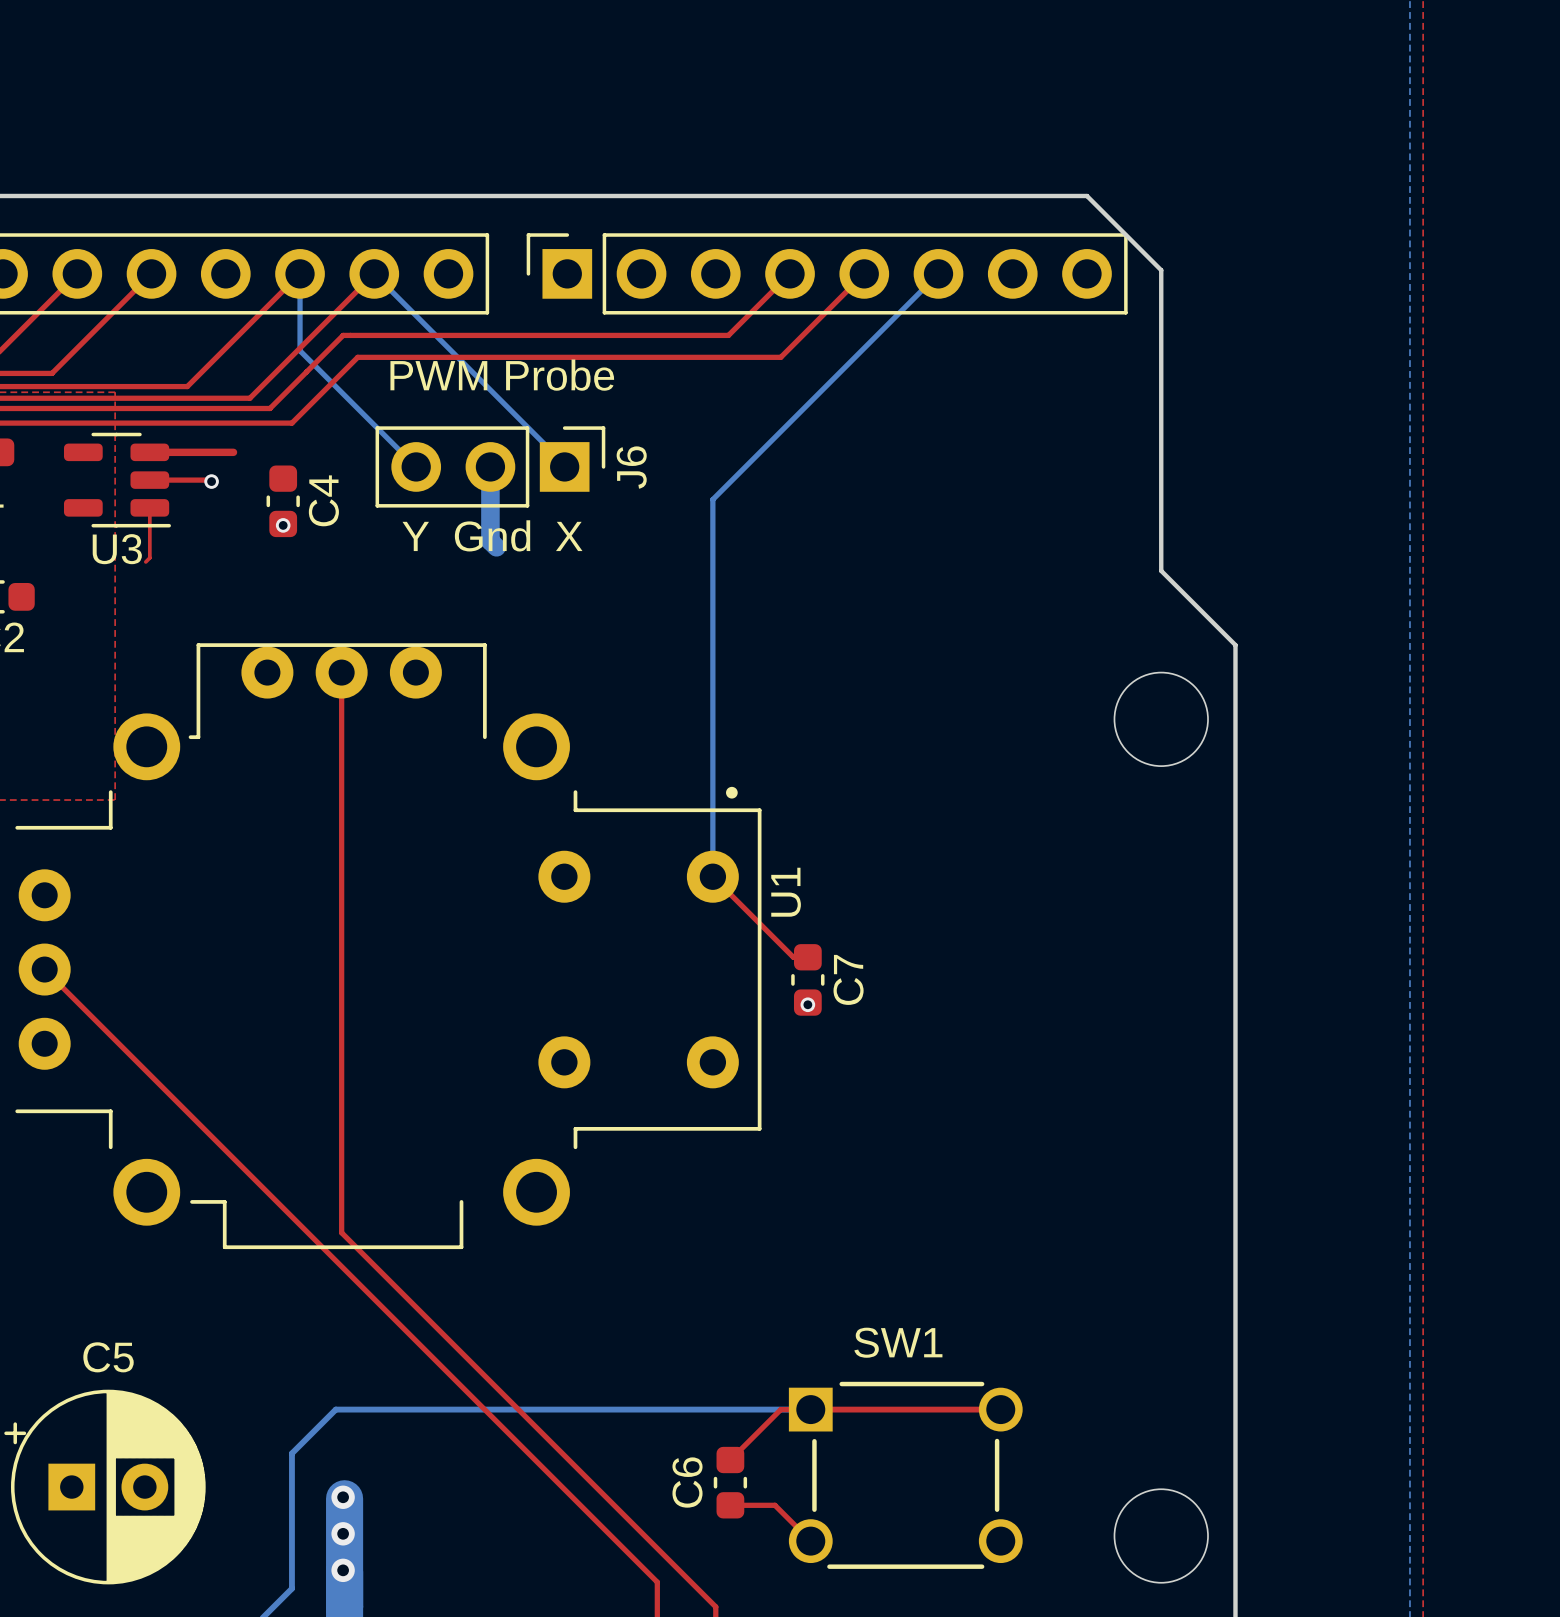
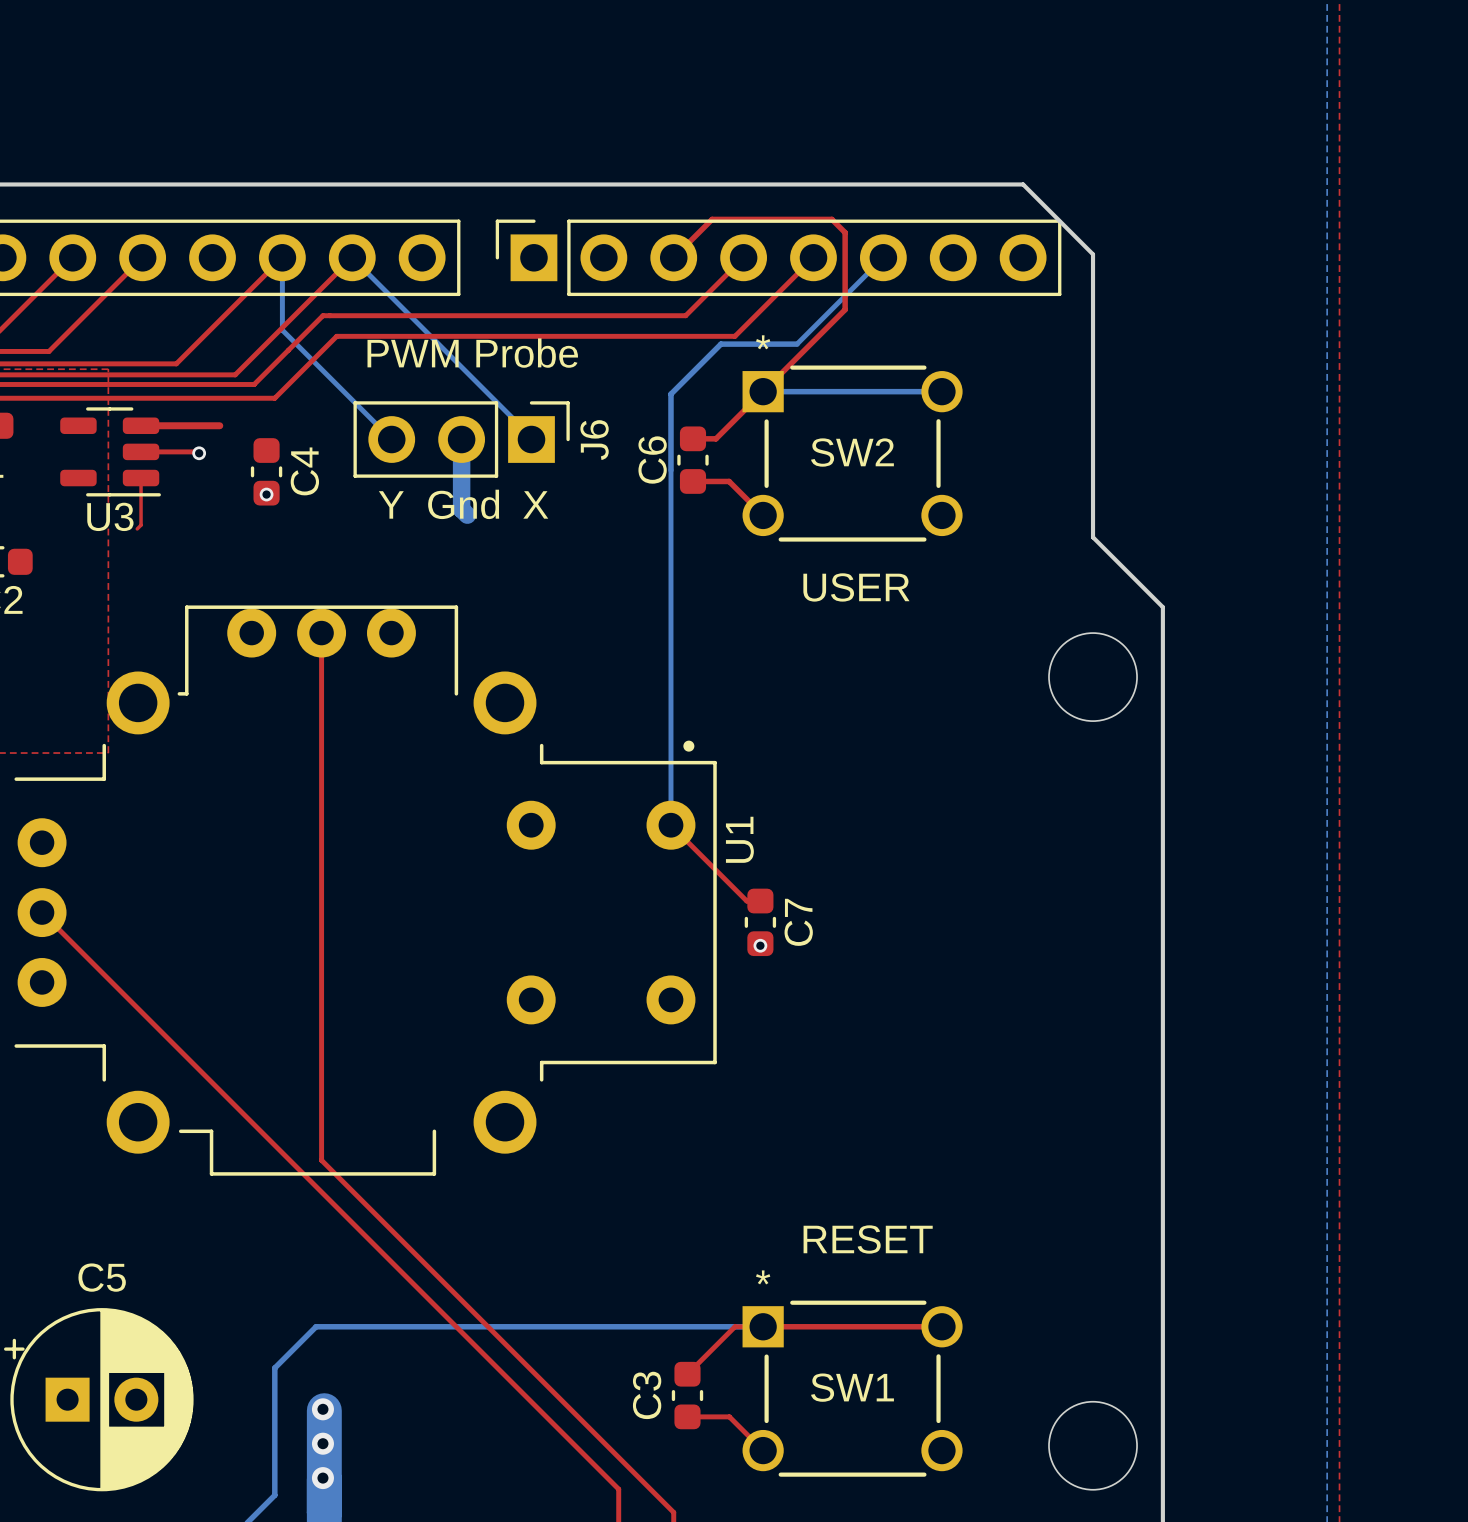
top track: none -> (673, 257) (712, 219) (831, 219) (845, 232) (845, 309) (715, 438) (692, 438)
bottom track: (846, 365) (712, 499) -> (797, 344) (720, 344) (670, 394) (670, 470)
bottom track: none -> (763, 391) (941, 391)
SW2: none -> (852, 453)
C6: none -> (692, 460)
top track: none -> (692, 481) (729, 481) (763, 515)
text: none -> USER (856, 587)
text: none -> RESET (868, 1239)
SW1 name position: SW1 (898, 1342) -> SW1 (852, 1387)
SW1 text: none -> * (763, 1277)
C6 name: C6 (687, 1482) -> C3 (647, 1395)

